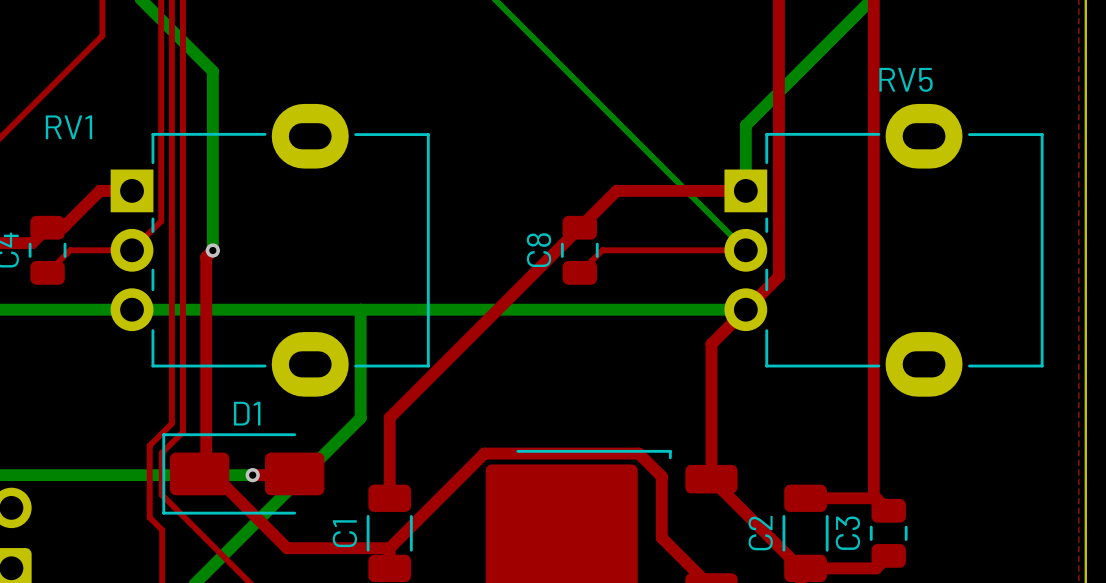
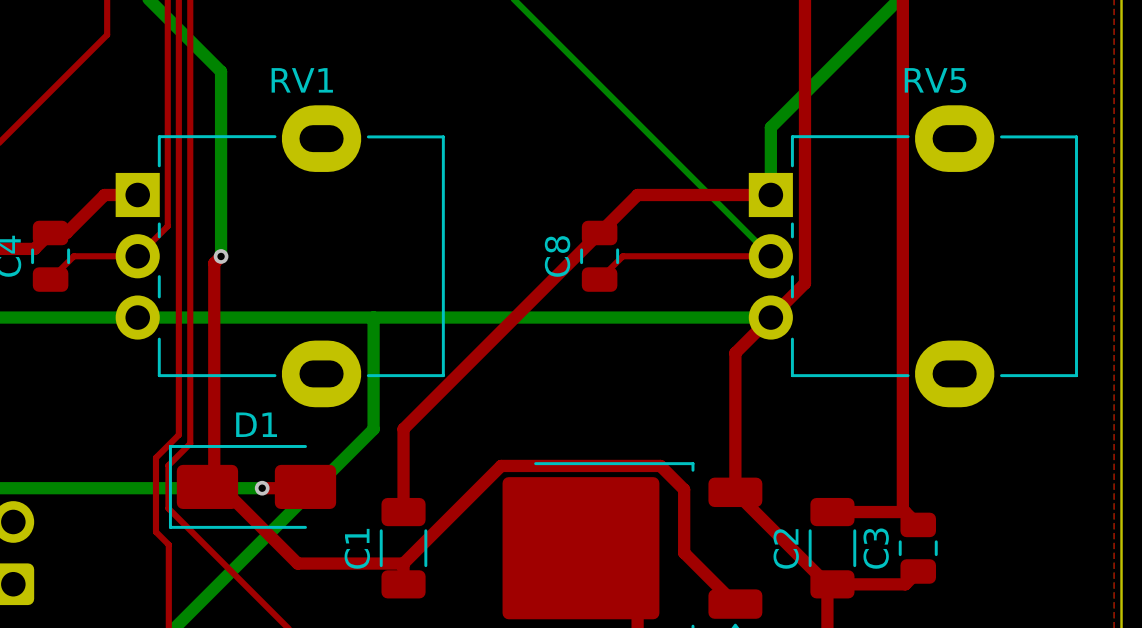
RV1 name position: RV1 (68, 127) -> RV1 (302, 80)

